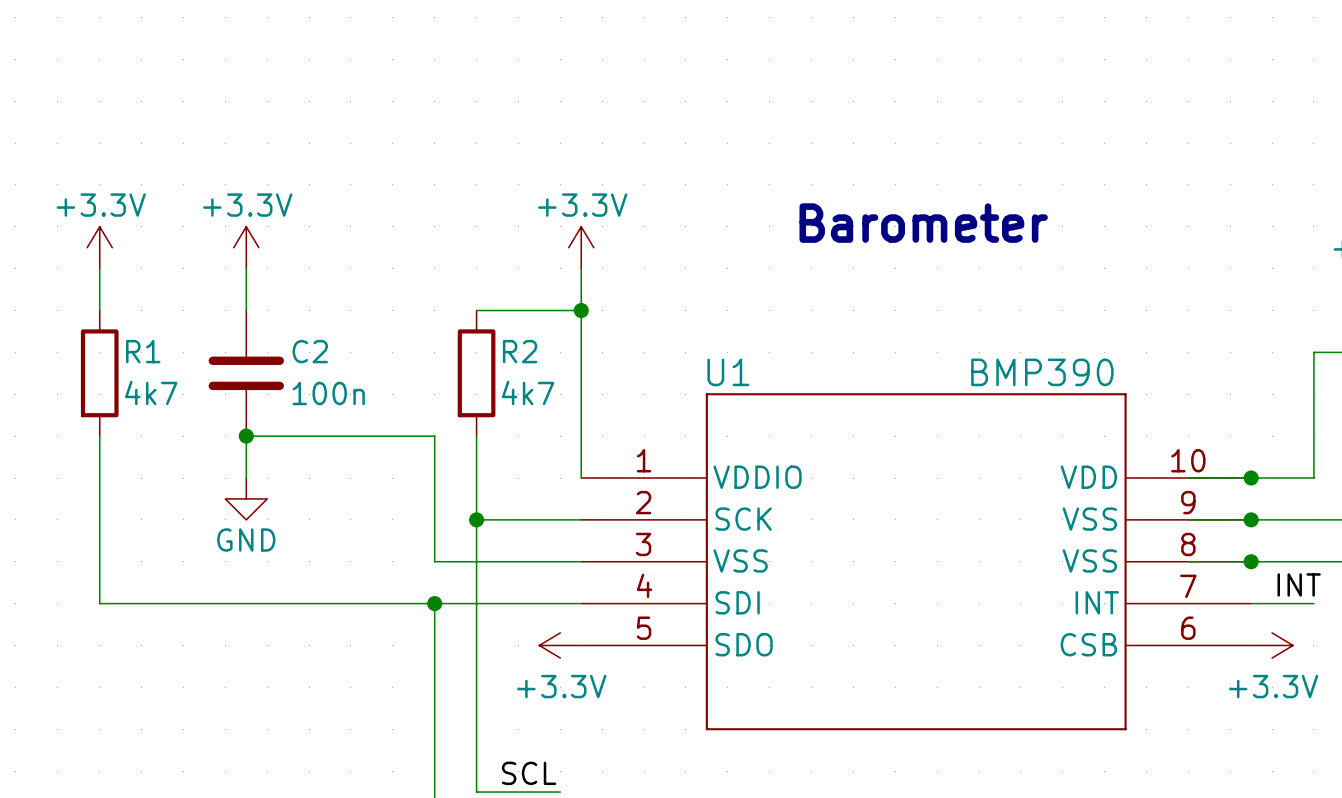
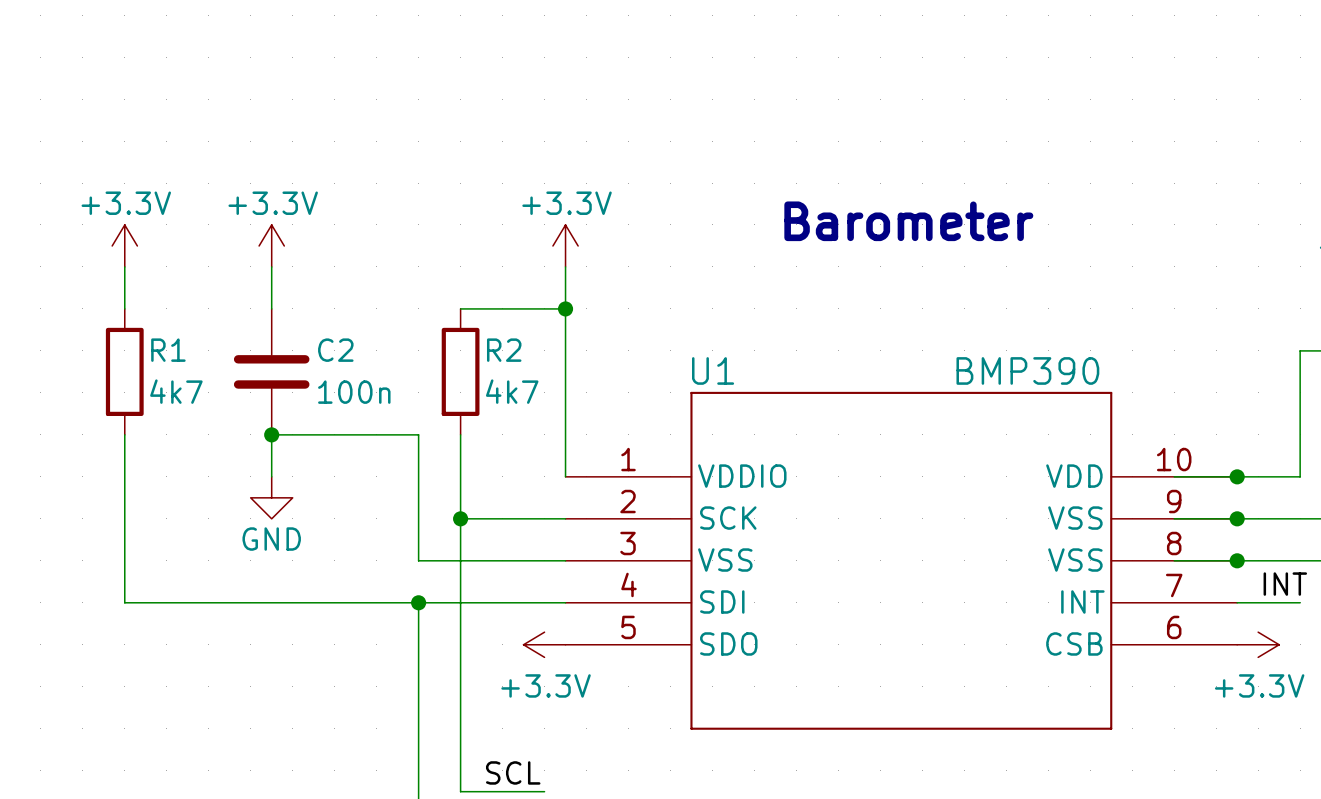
power symbol position: +3.3V (99, 247) -> +3.3V (124, 245)
power symbol position: +3.3V (246, 247) -> +3.3V (271, 245)
wire: (99, 268) (99, 310) -> (124, 266) (124, 308)
wire: (246, 268) (246, 310) -> (271, 266) (271, 308)
R1 position: (99, 373) -> (124, 371)
C2 position: (246, 373) -> (271, 371)
wire: (99, 436) (99, 603) (141, 603) -> (124, 434) (124, 602)
junction position: (246, 436) -> (271, 434)
wire: (288, 436) (246, 436) (246, 478) -> (271, 434) (271, 476)
power symbol position: GND (246, 498) -> GND (271, 497)

